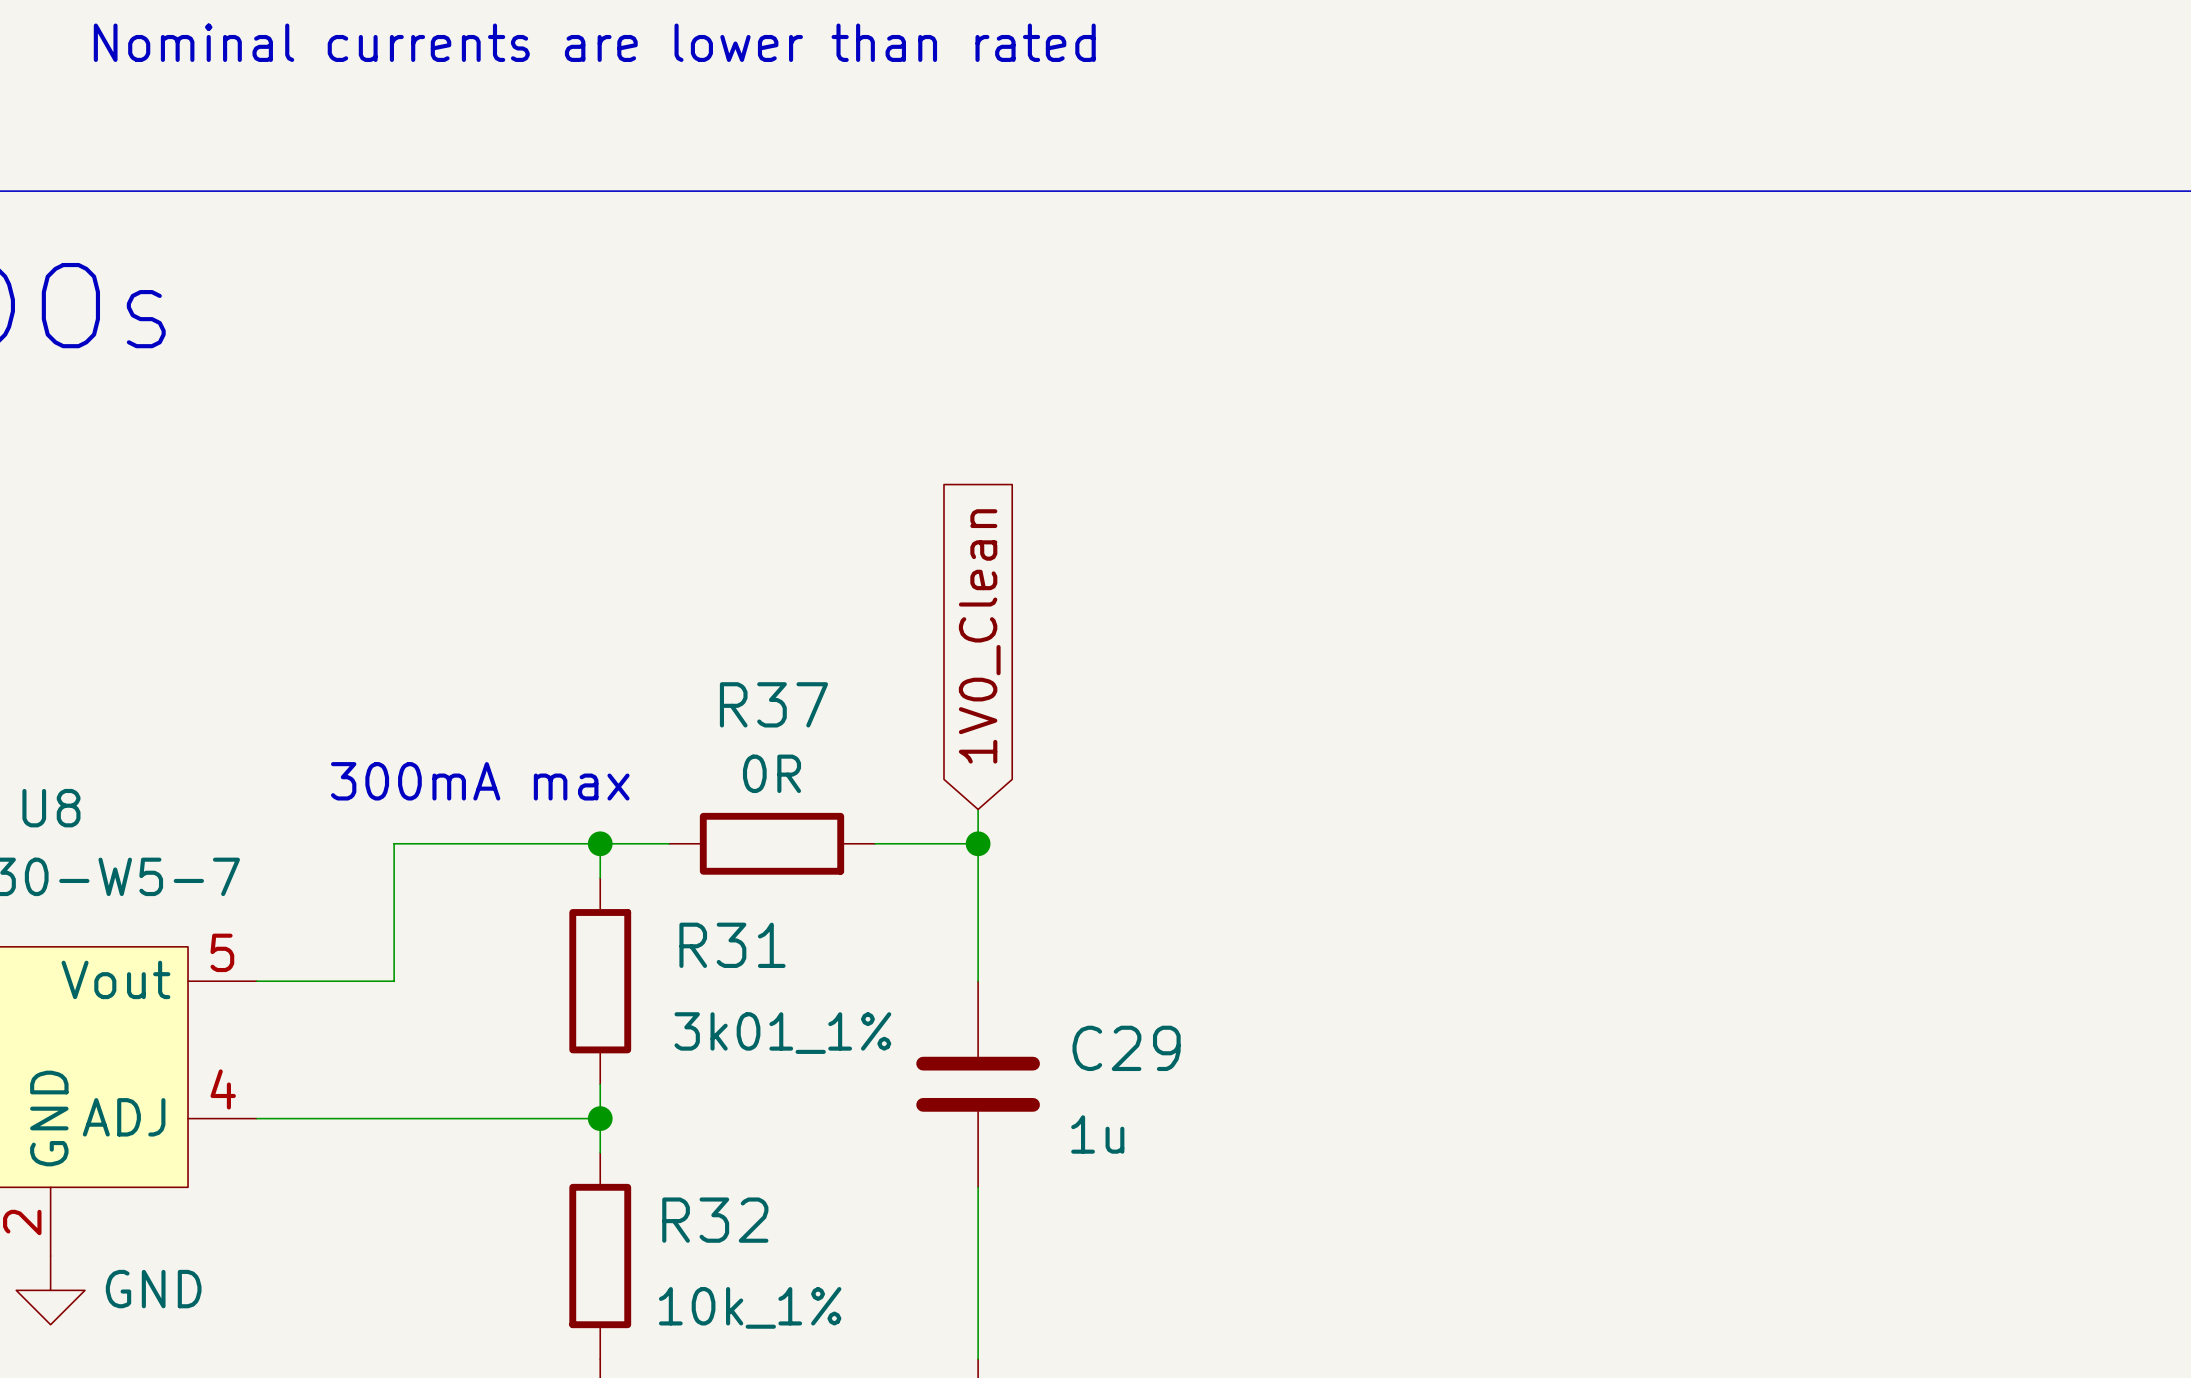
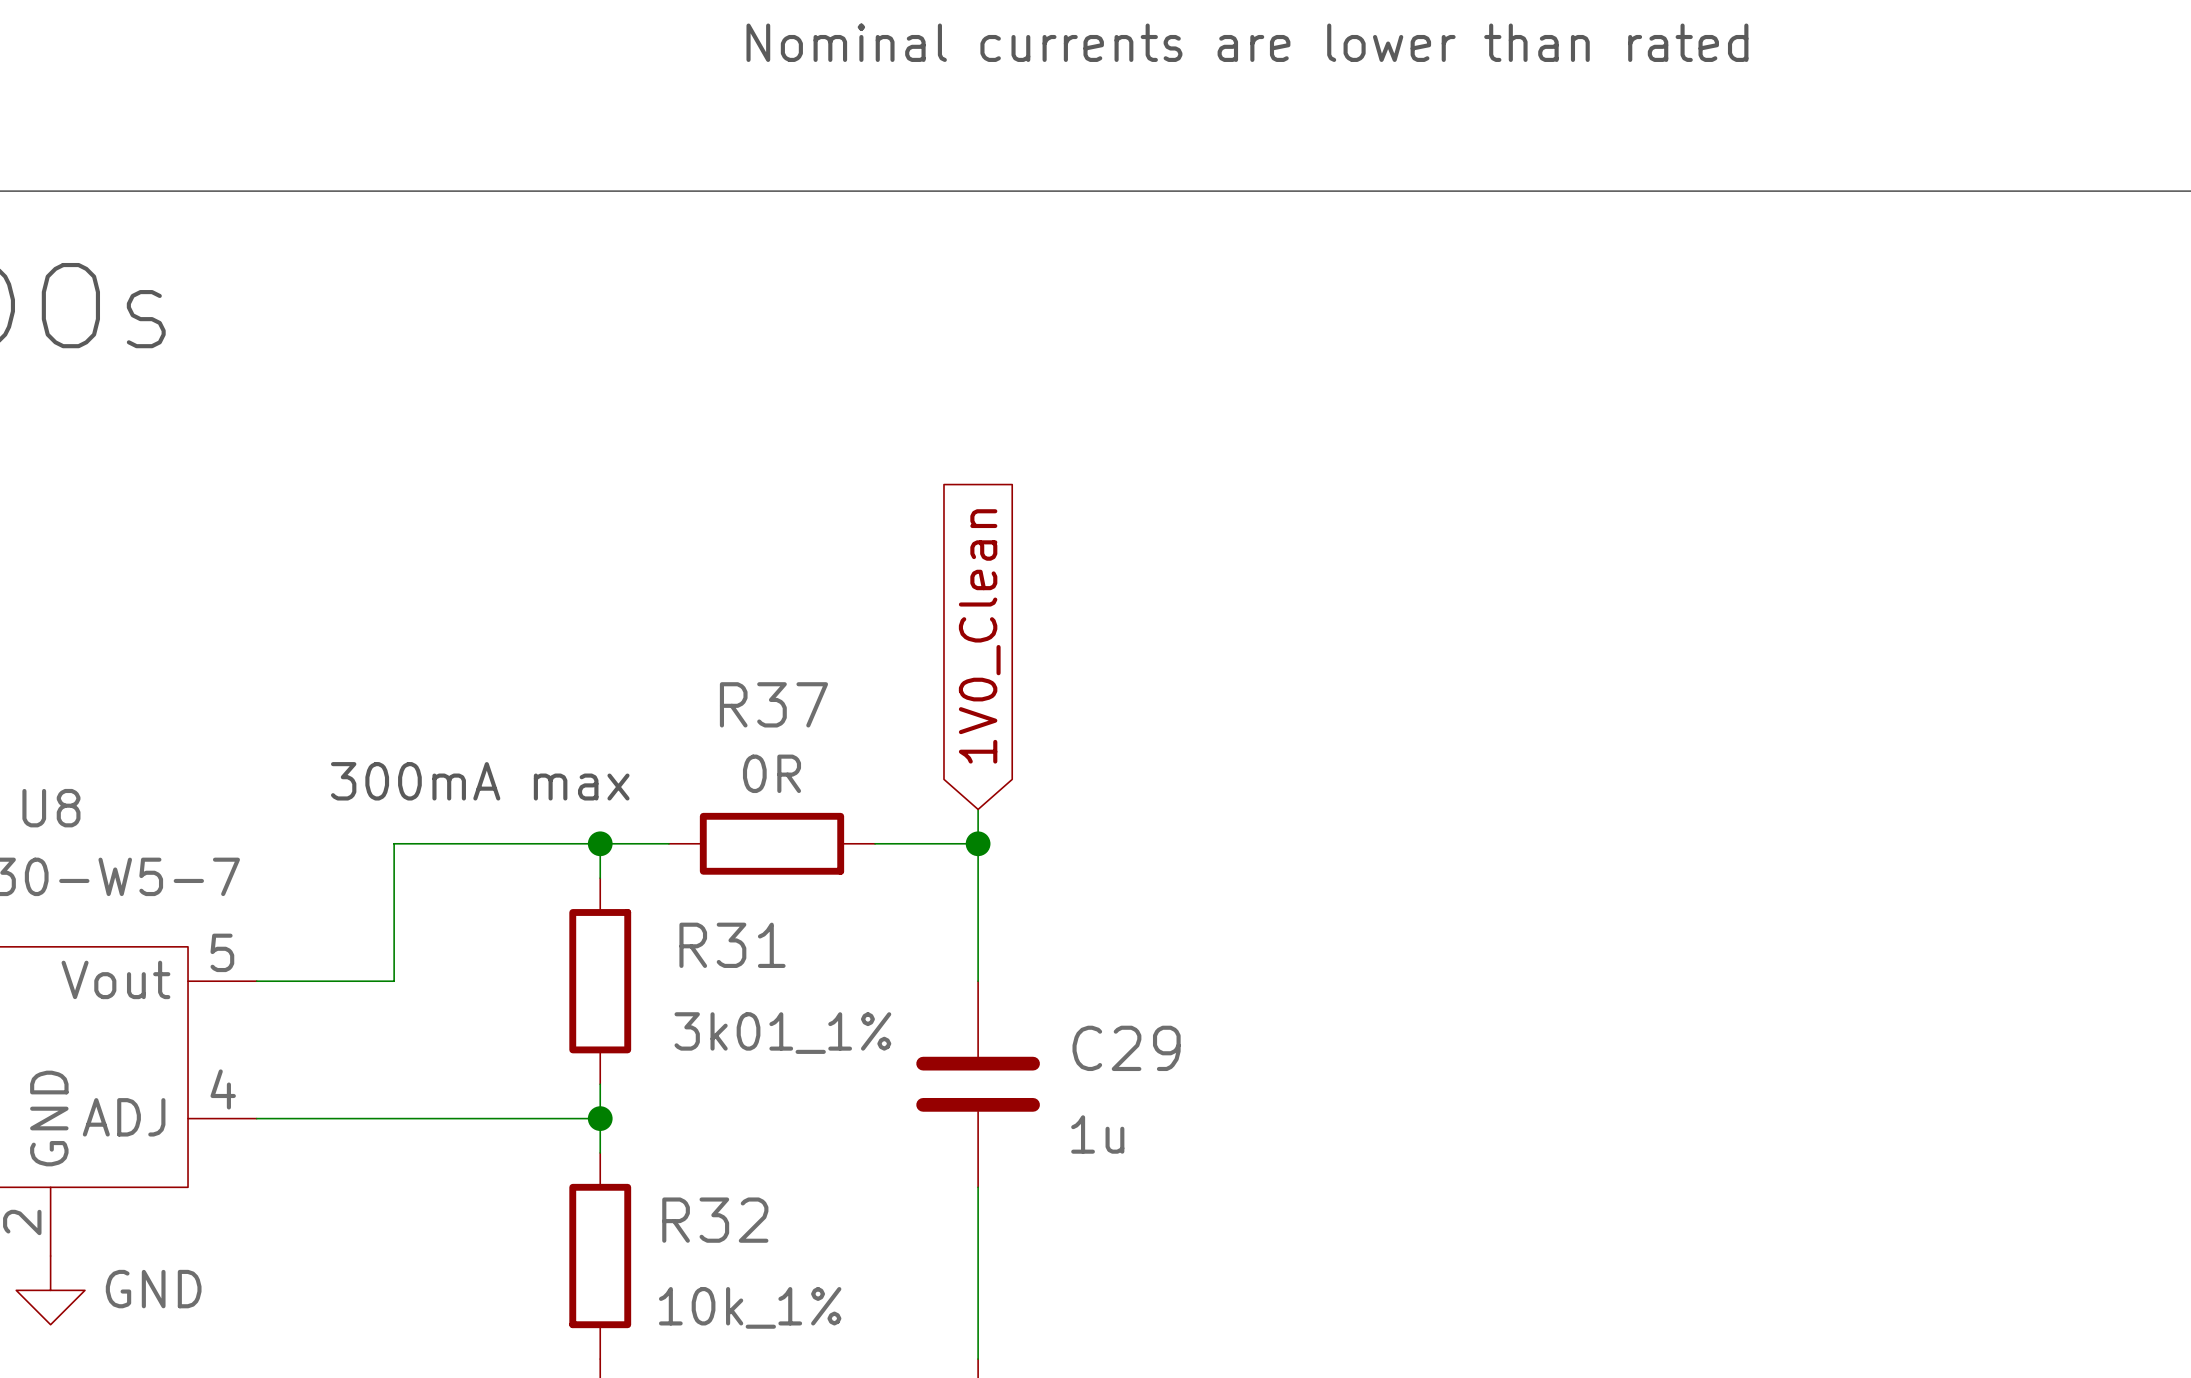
text position: Nominal currents are lower than rated (594, 42) -> Nominal currents are lower than rated (1247, 42)

